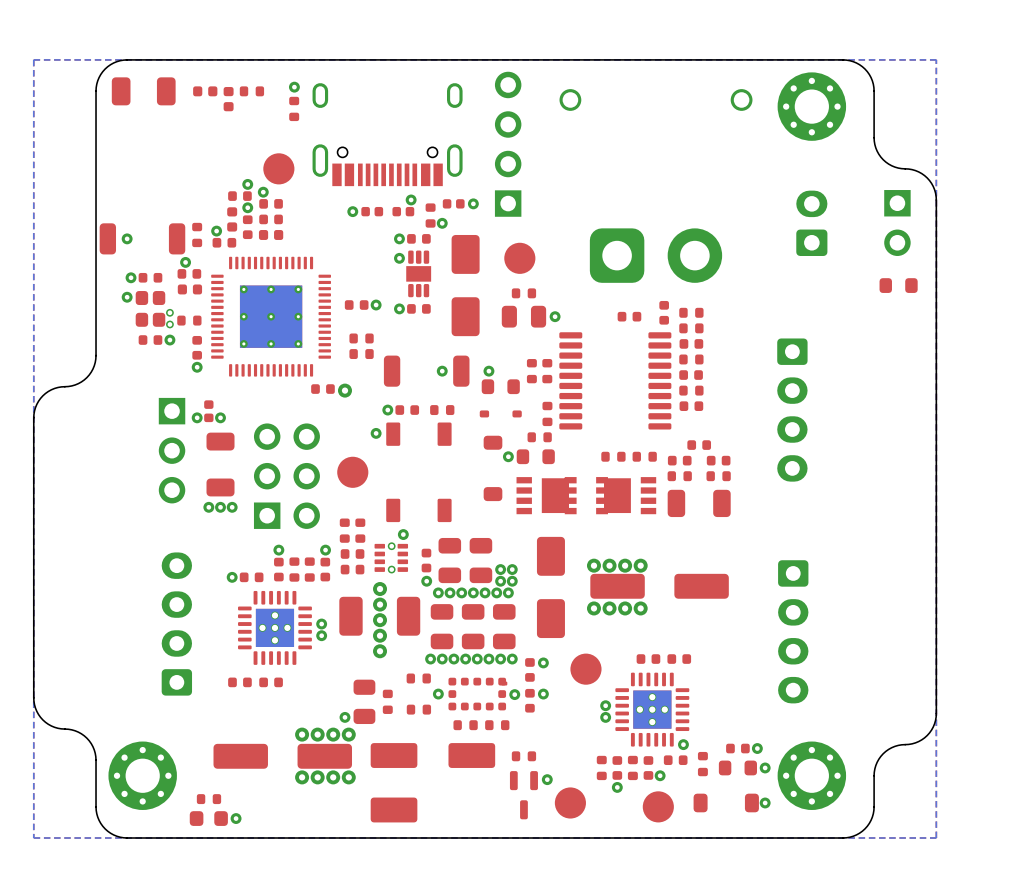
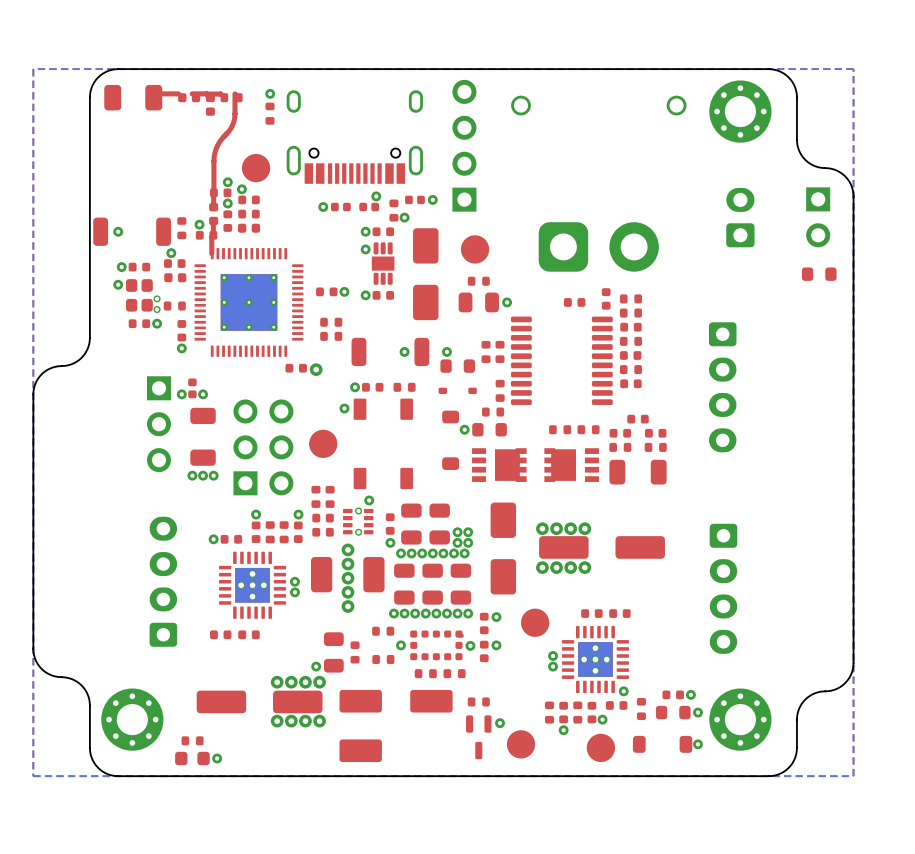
top track: none -> (178, 93) (152, 93)
top track: none -> (220, 93) (192, 93)
top track: none -> (235, 93) (233, 122) (218, 144) (214, 154) (213, 207)
top track: none -> (213, 220) (211, 253)

